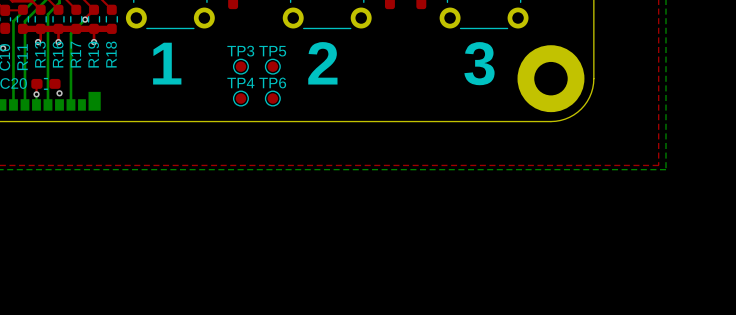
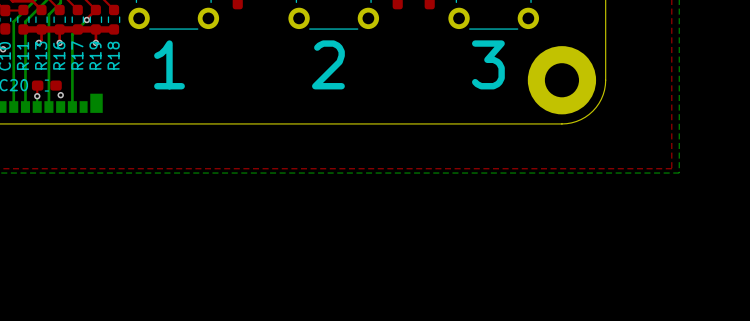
TP3: (240, 66) -> none
TP5: (272, 66) -> none
TP4: (240, 98) -> none
TP6: (272, 98) -> none

